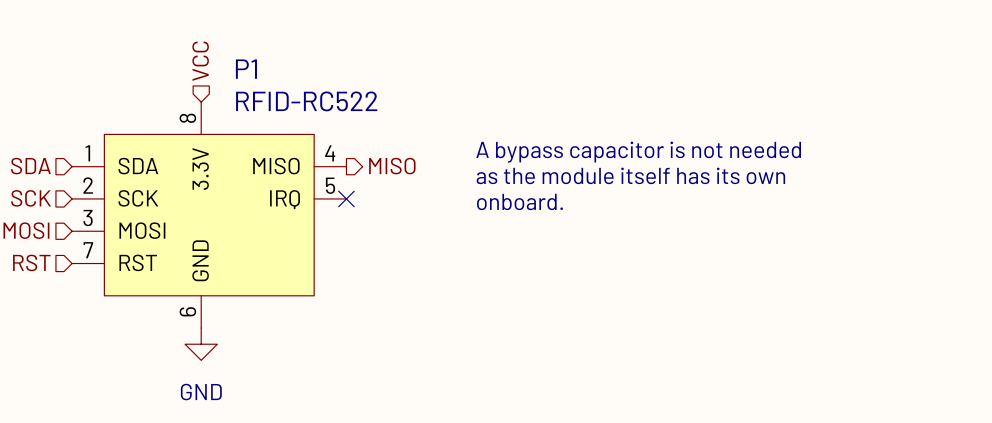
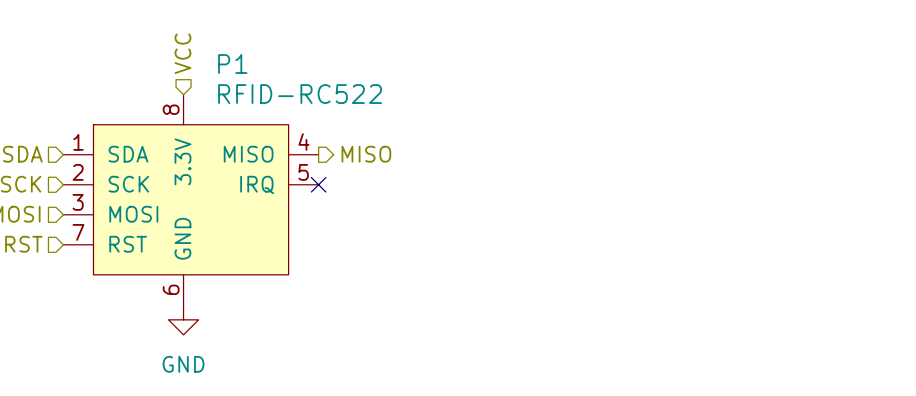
text: A bypass capacitor is not needed (638, 152) -> none
text: as the module itself has its own (630, 175) -> none
text: onboard. (519, 201) -> none

